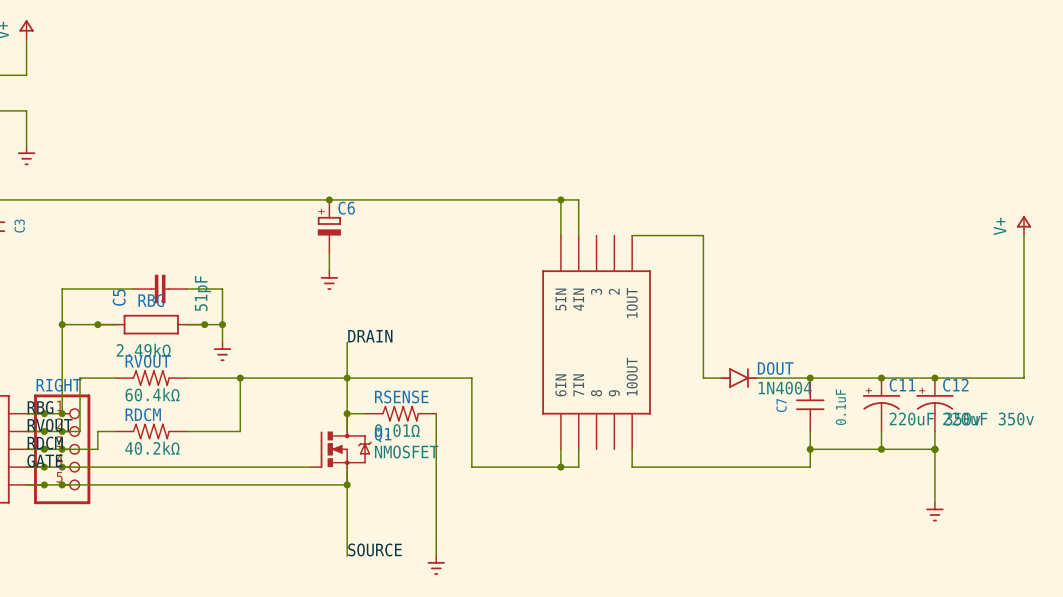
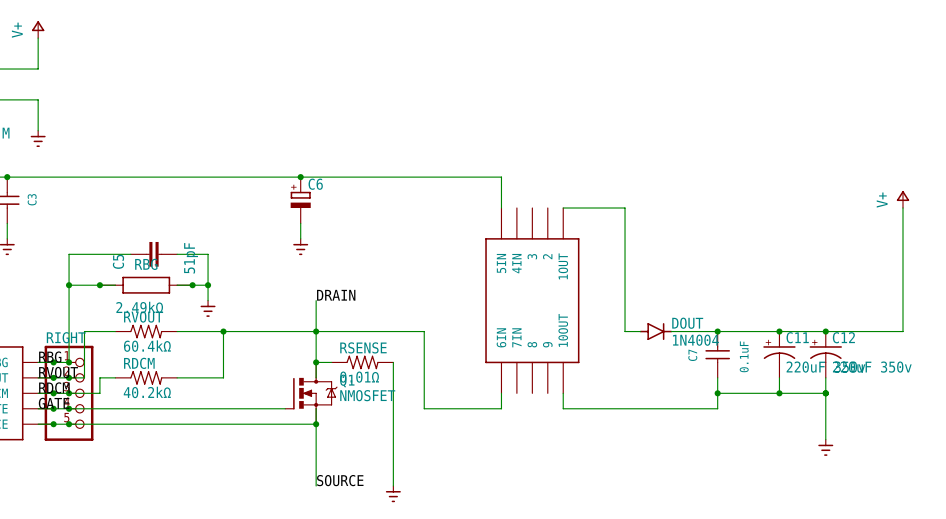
wire: (560, 199) (578, 199) (578, 235) -> none
junction: (560, 199) -> none
wire: (578, 449) (578, 467) (560, 467) -> none
junction: (560, 467) -> none

